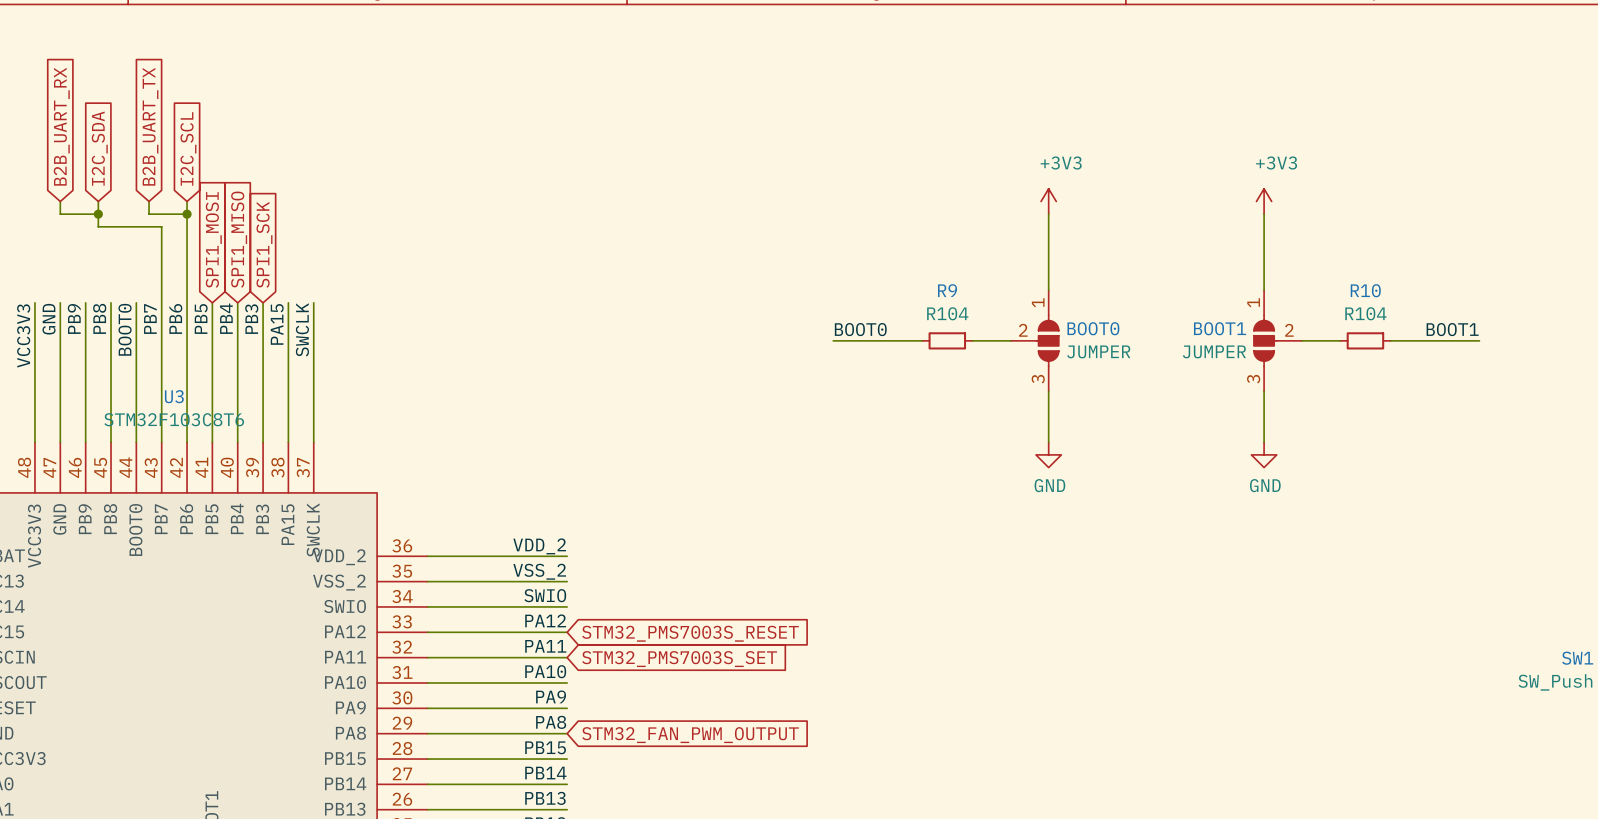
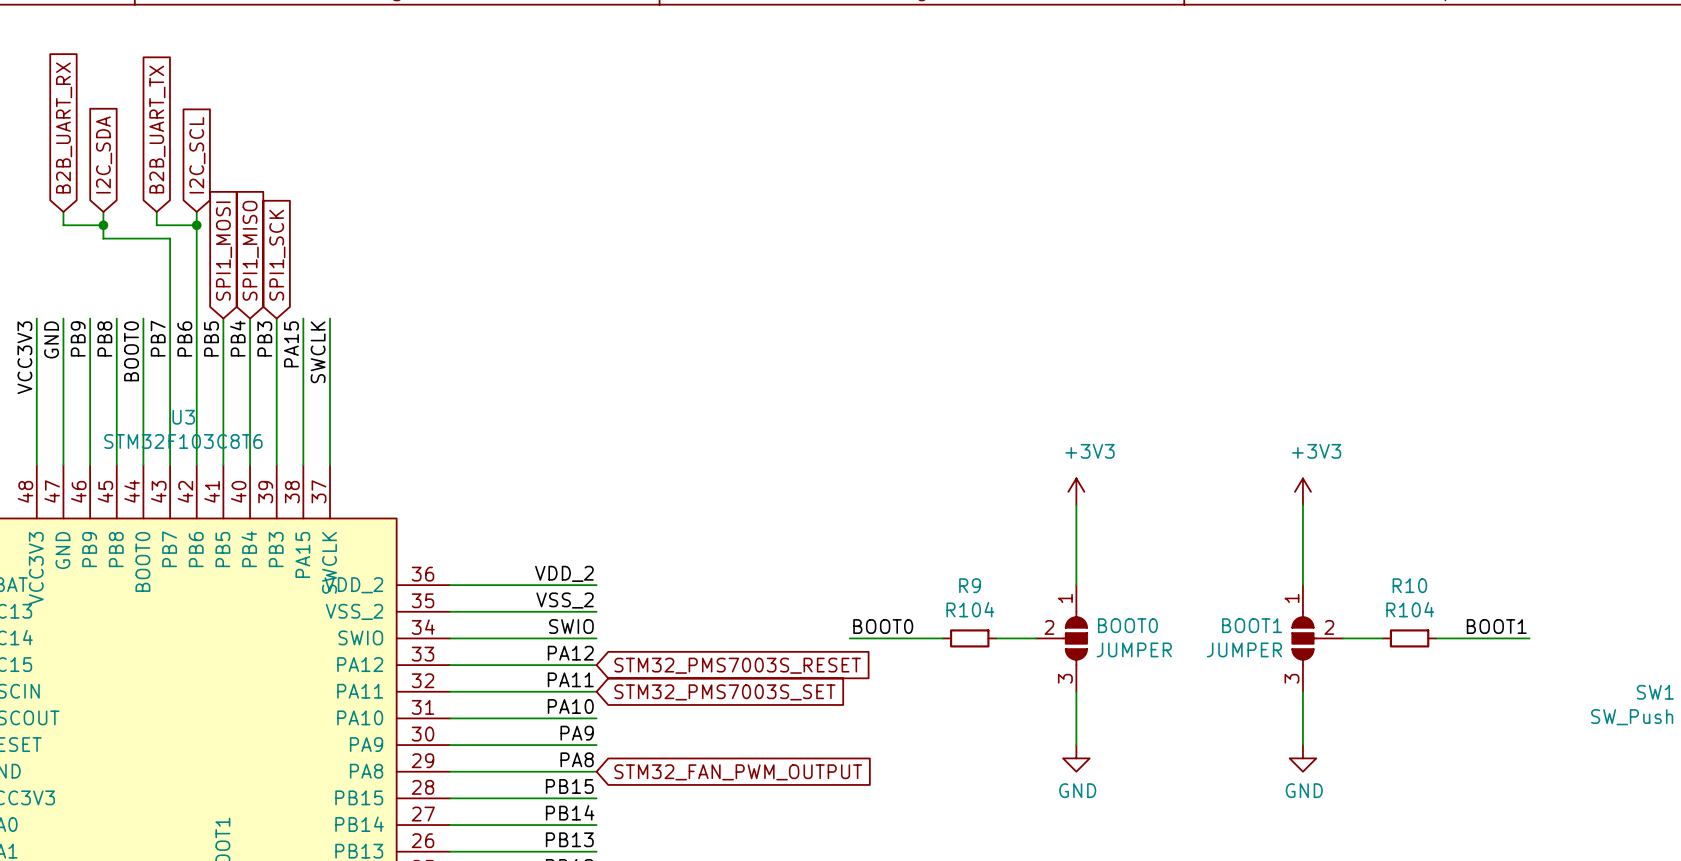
power symbol: +3V3 (1048, 201) -> none
power symbol: +3V3 (1264, 201) -> none
wire: (1048, 214) (1048, 290) -> none
wire: (1264, 214) (1264, 290) -> none
label: BOOT0 (860, 329) -> none
label: BOOT1 (1452, 329) -> none
wire: (833, 340) (921, 340) -> none
R9 position: (947, 340) -> (969, 638)
wire: (972, 340) (1010, 340) -> none
BOOT0 position: (1034, 340) -> (1061, 638)
BOOT1 position: (1278, 340) -> (1317, 638)
wire: (1302, 340) (1340, 340) -> none
R10 position: (1365, 340) -> (1409, 638)
wire: (1390, 340) (1479, 340) -> none
wire: (1048, 391) (1048, 442) -> none
wire: (1264, 391) (1264, 442) -> none
power symbol: GND (1048, 454) -> none
power symbol: GND (1264, 454) -> none
power symbol: none -> +3V3 (1076, 491)
power symbol: none -> +3V3 (1302, 491)
wire: none -> (1076, 505) (1076, 585)
wire: none -> (1302, 505) (1302, 585)
label: none -> BOOT0 (883, 626)
label: none -> BOOT1 (1496, 626)
wire: none -> (849, 638) (943, 638)
wire: none -> (996, 638) (1036, 638)
wire: none -> (1342, 638) (1382, 638)
wire: none -> (1436, 638) (1529, 638)
wire: none -> (1076, 691) (1076, 745)
wire: none -> (1302, 691) (1302, 745)
power symbol: none -> GND (1076, 758)
power symbol: none -> GND (1302, 758)

